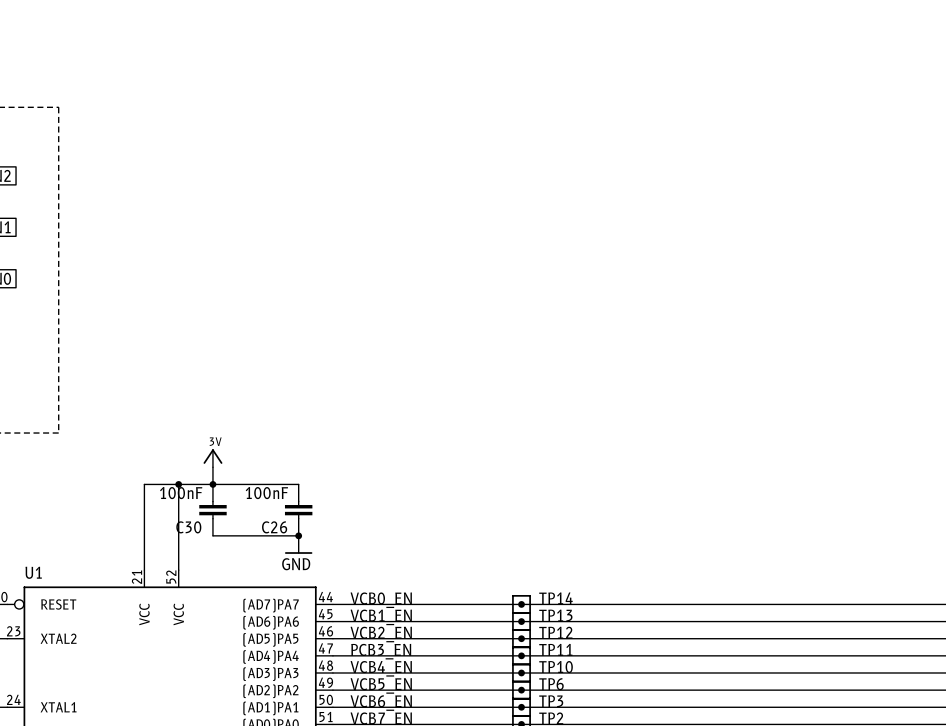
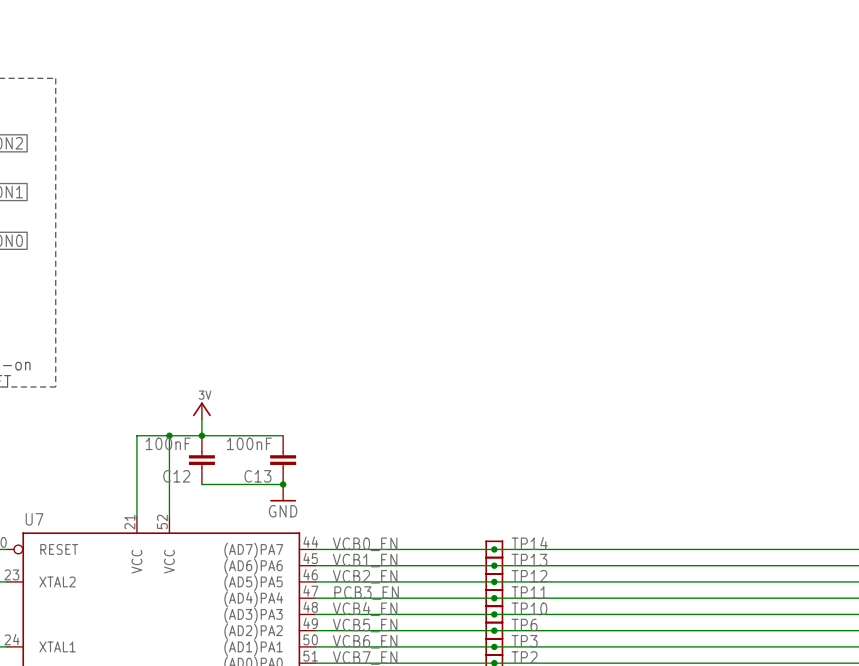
C30 name: C30 (188, 527) -> C12 (176, 476)
C26 name: C26 (274, 527) -> C13 (257, 476)
U1 name: U1 (33, 572) -> U7 (34, 519)

